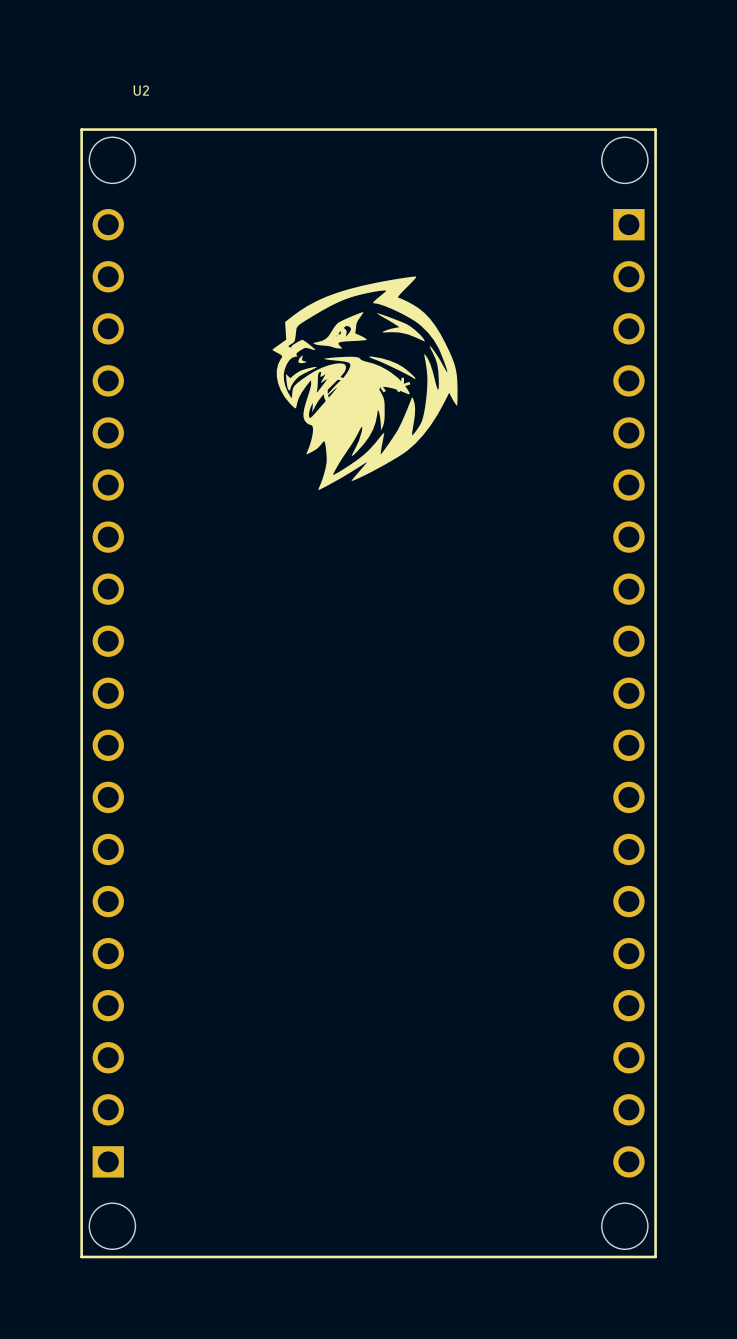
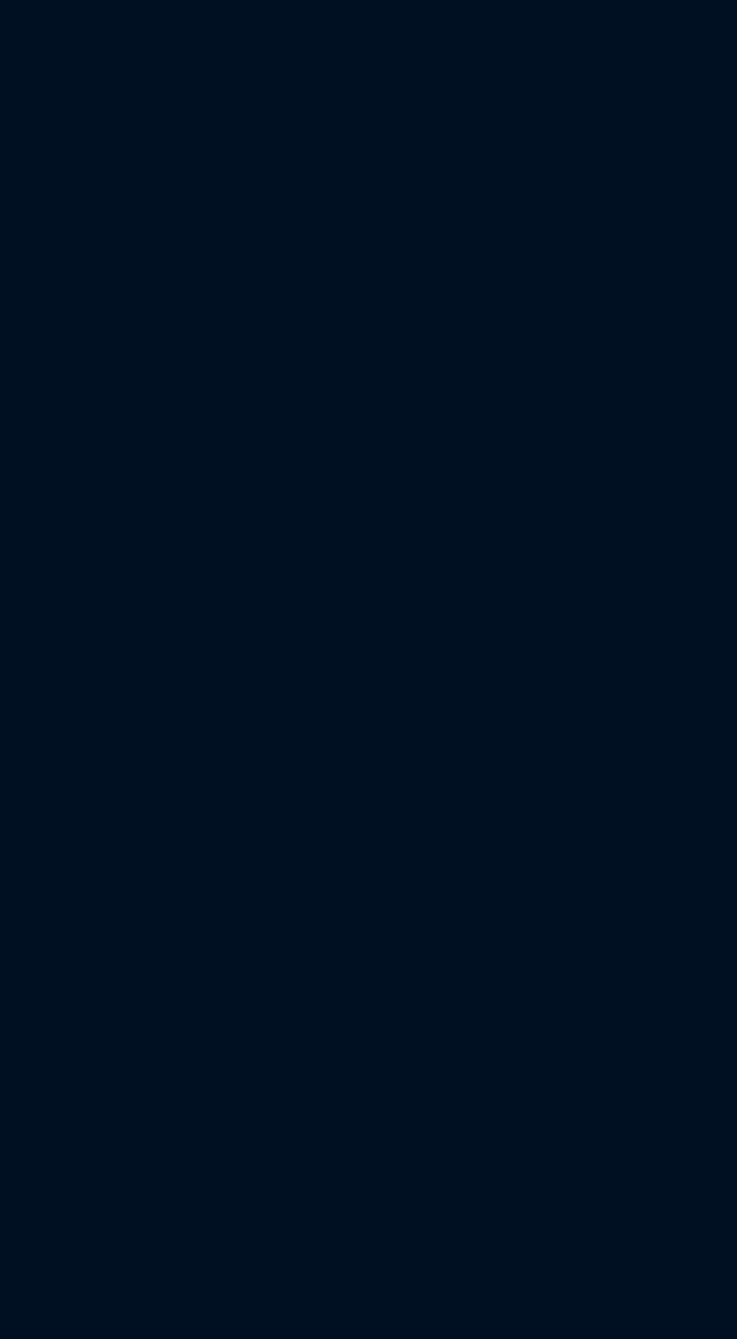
part: (364, 383) -> none
U2: (368, 693) -> none

